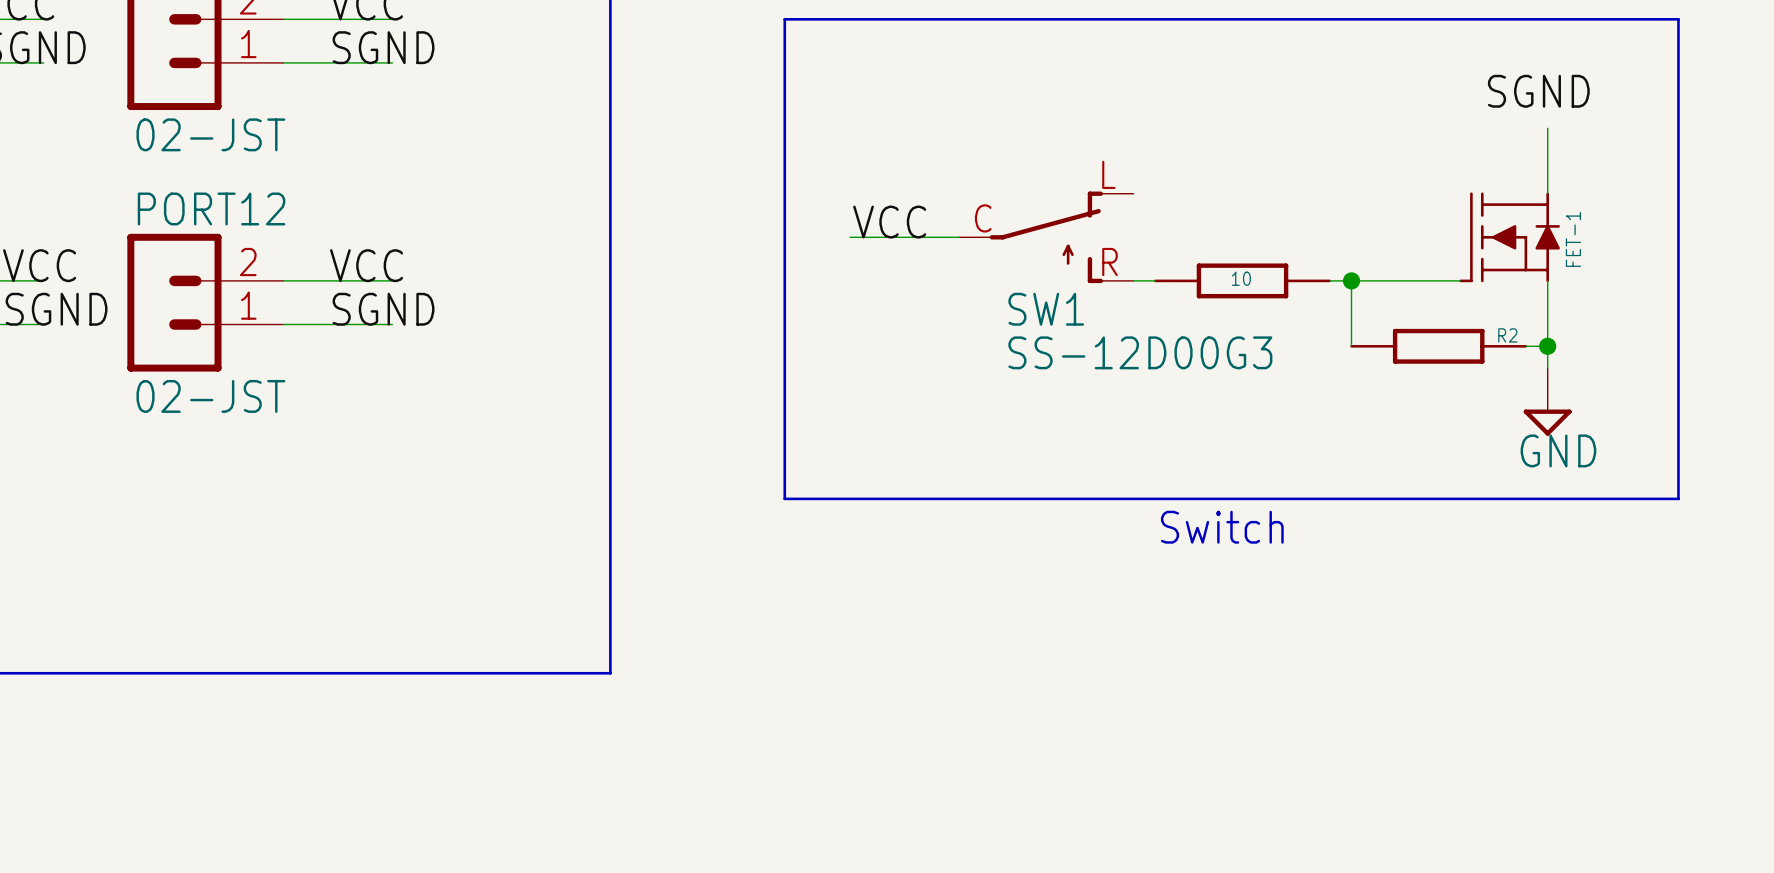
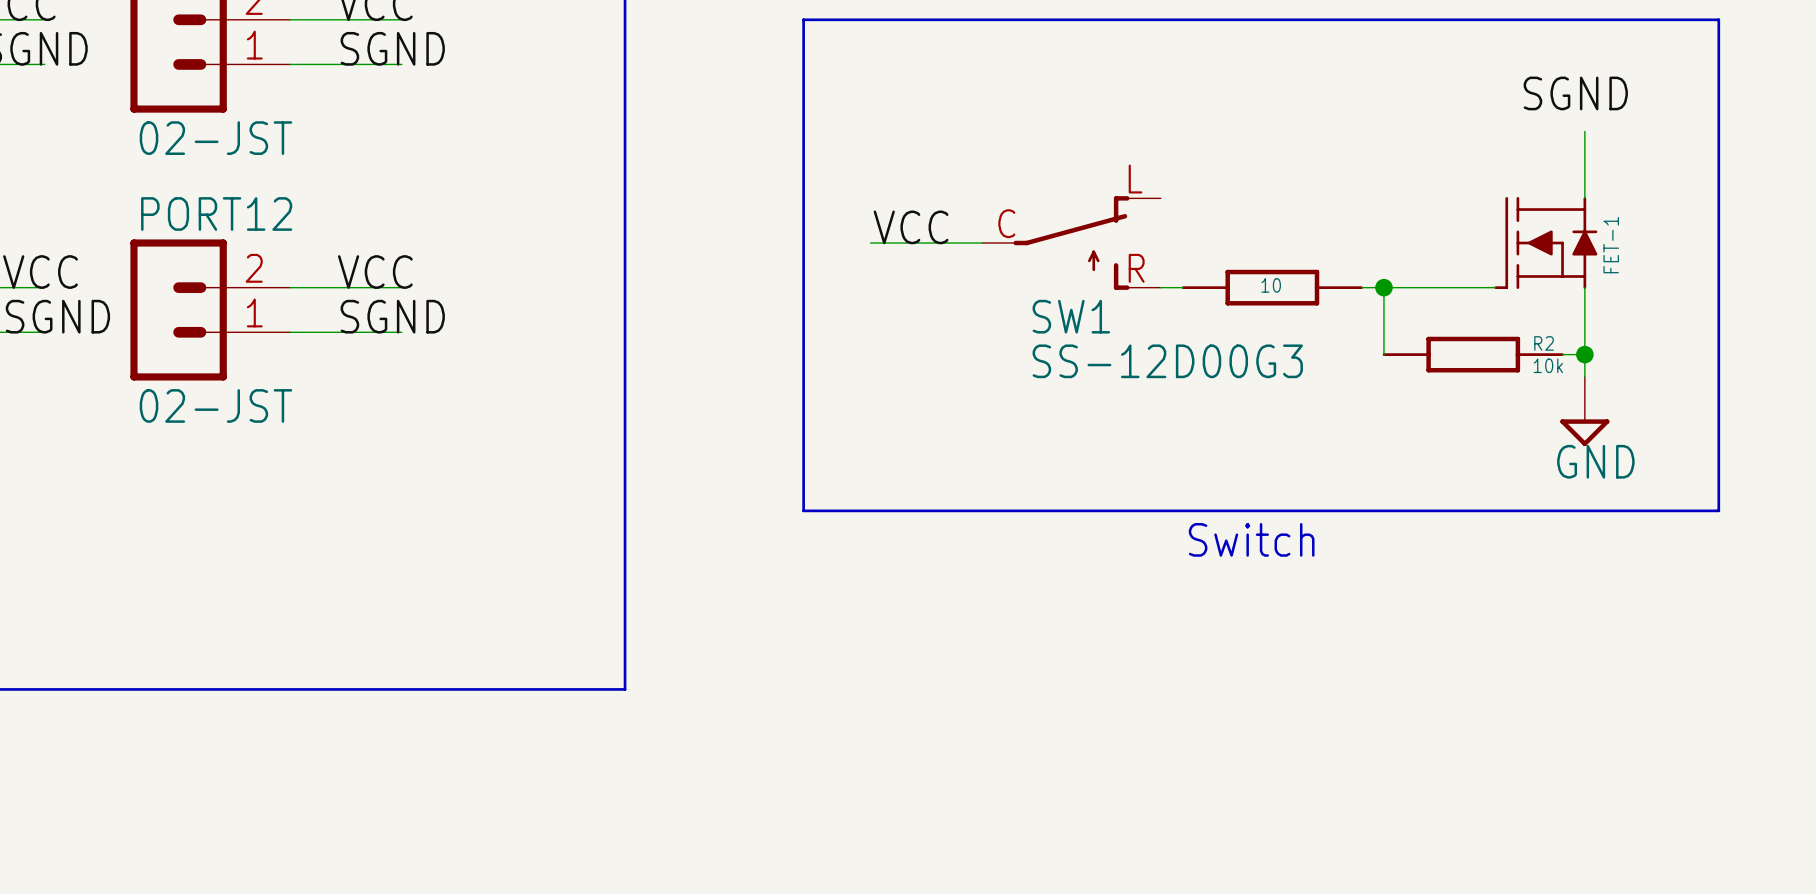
R2 text: none -> 10k (1548, 365)

